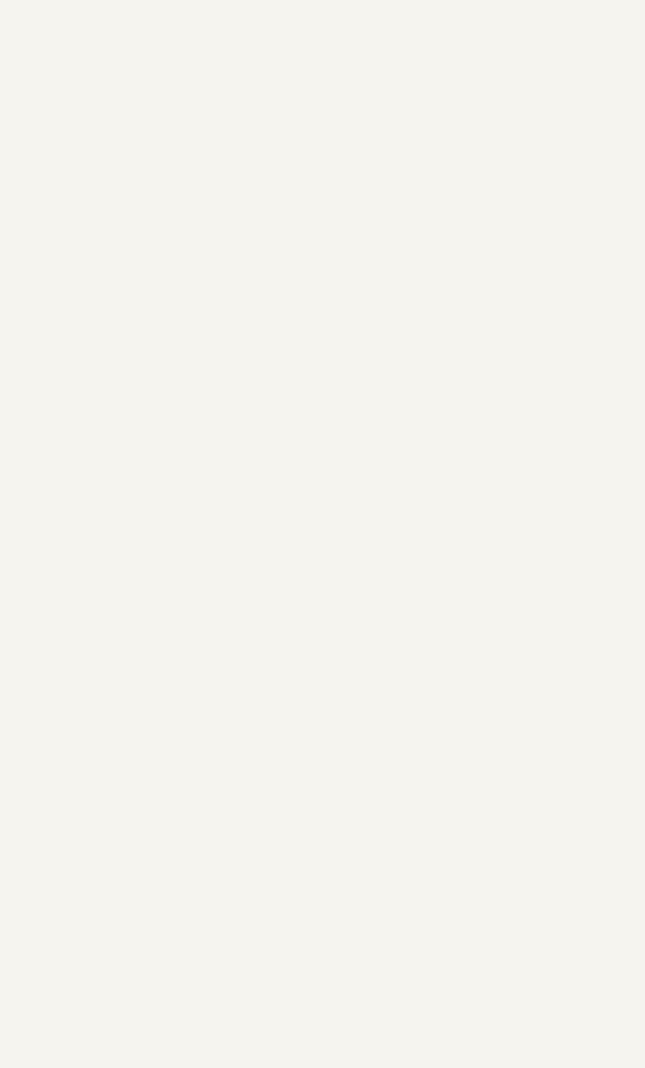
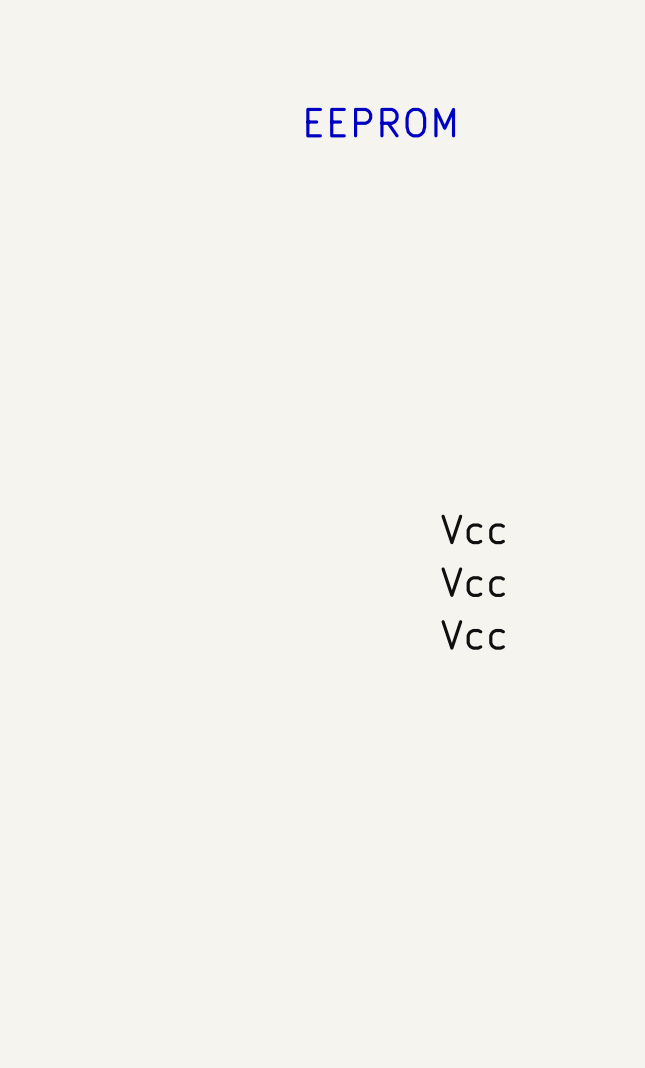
text: none -> EEPROM (380, 122)
label: none -> Vcc (473, 529)
label: none -> Vcc (473, 582)
label: none -> Vcc (473, 634)

